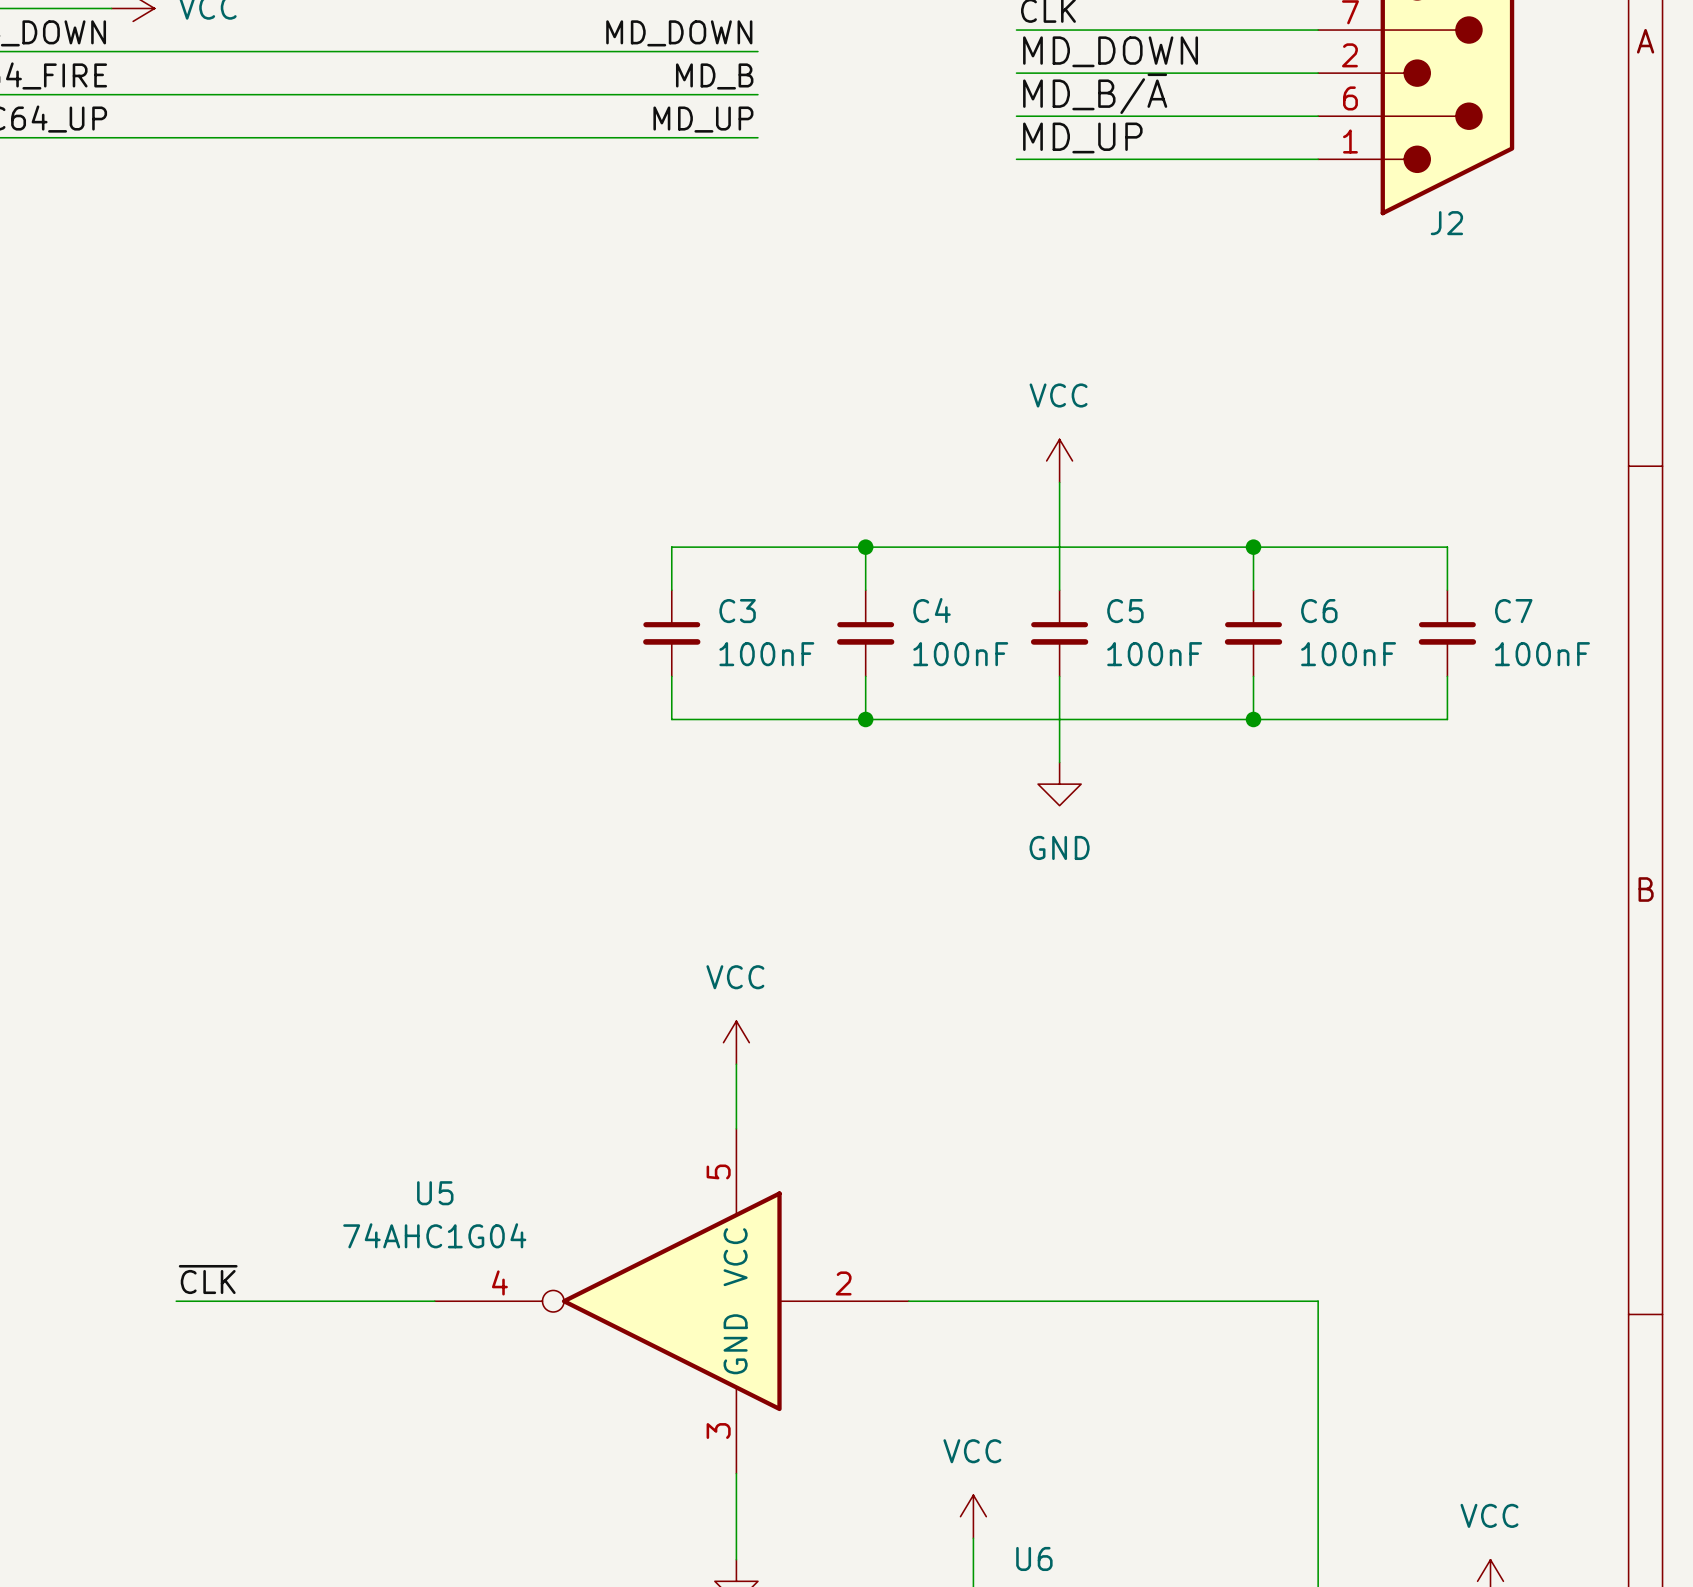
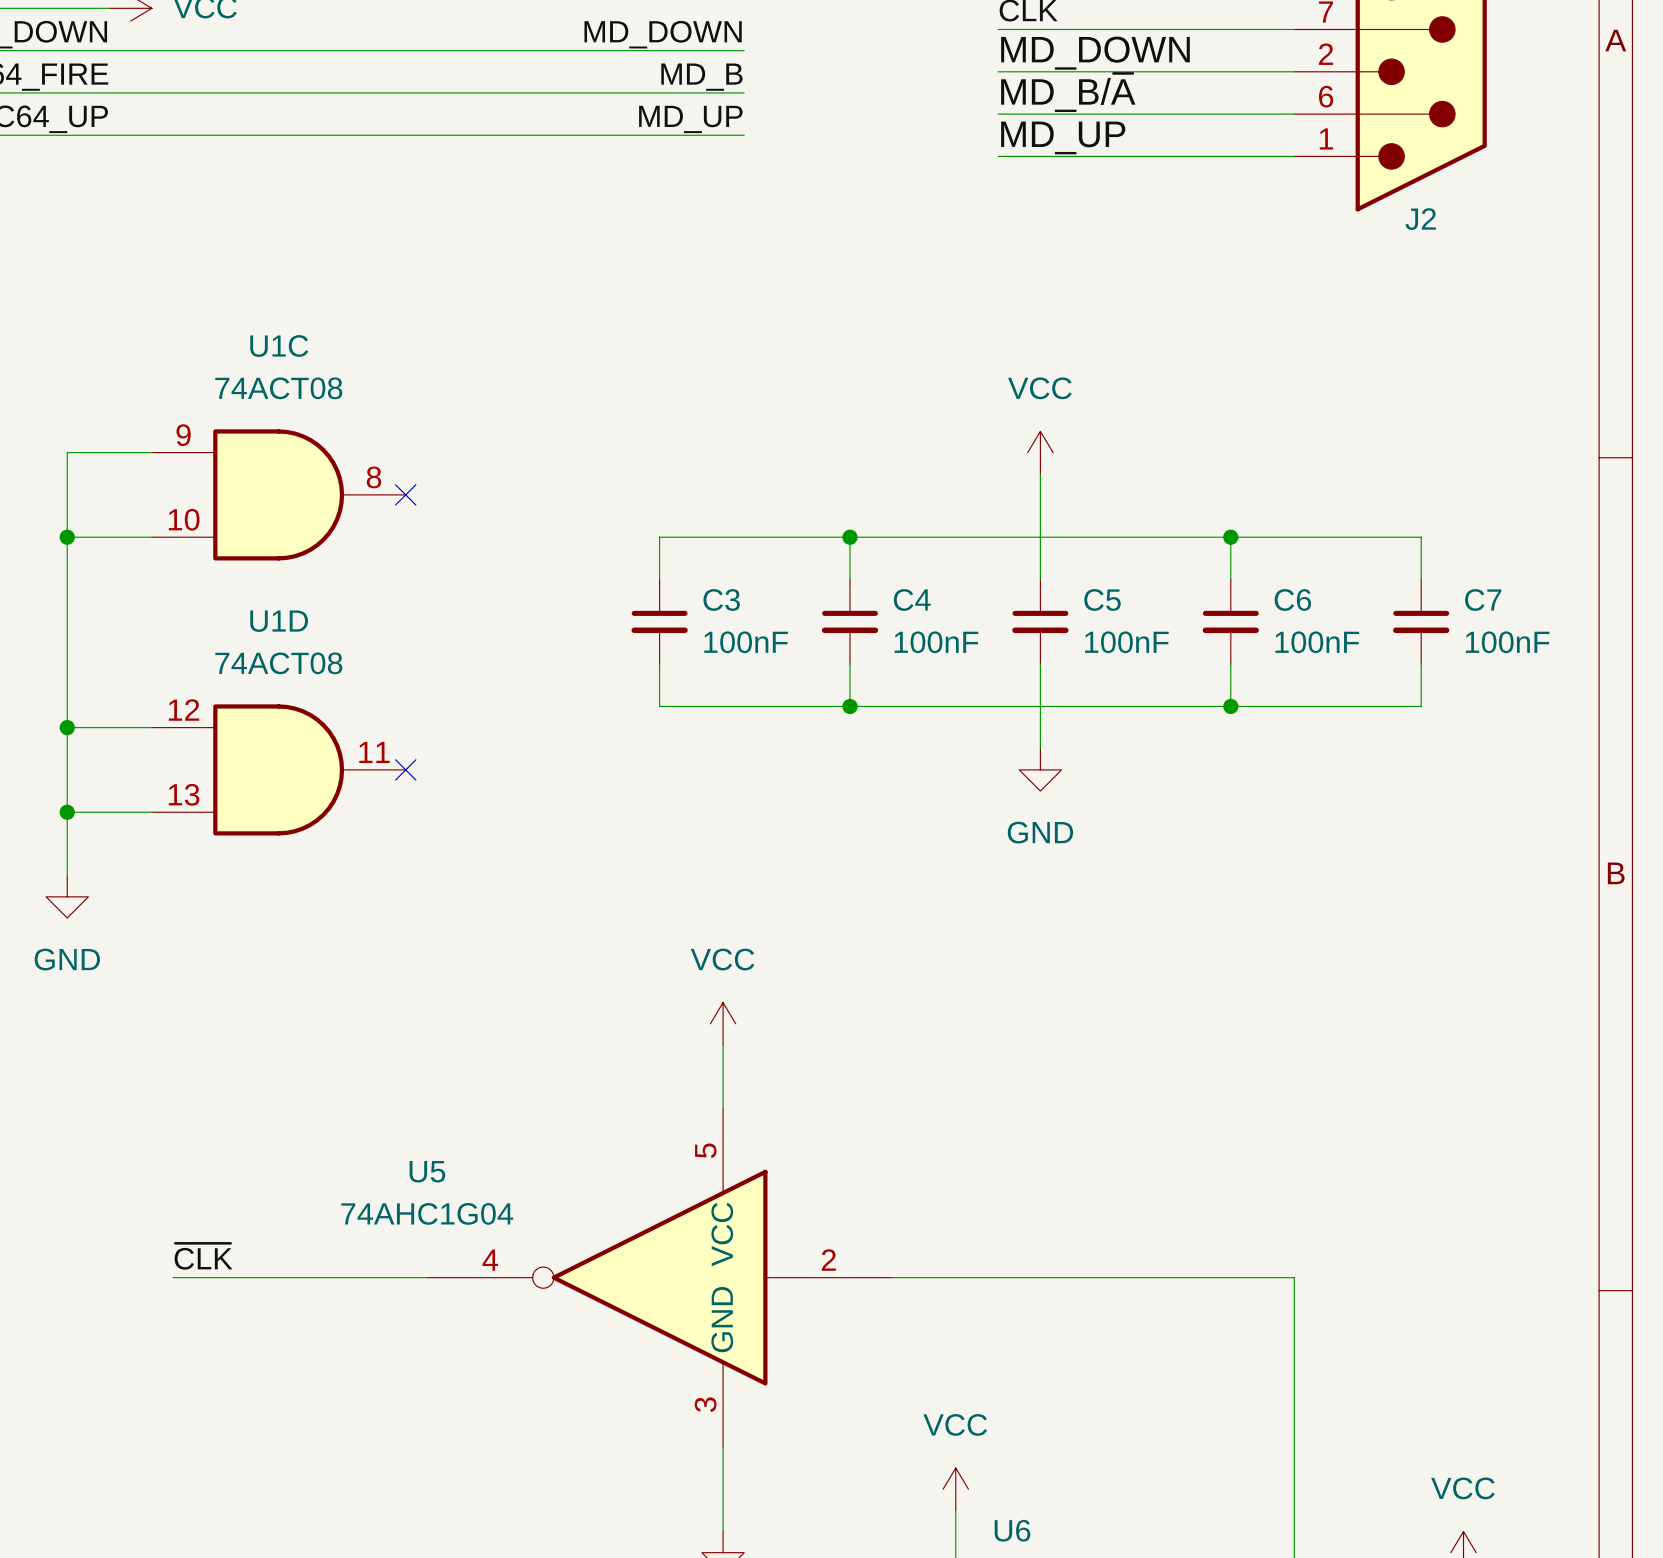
wire: none -> (151, 452) (67, 452) (67, 875)
U1C: none -> 74ACT08 (278, 494)
no-connect mark: none -> (405, 494)
wire: none -> (67, 537) (151, 537)
junction: none -> (67, 537)
wire: none -> (67, 727) (151, 727)
junction: none -> (67, 727)
U1D: none -> 74ACT08 (278, 769)
no-connect mark: none -> (405, 769)
wire: none -> (67, 812) (151, 812)
junction: none -> (67, 812)
power symbol: none -> GND (67, 896)

